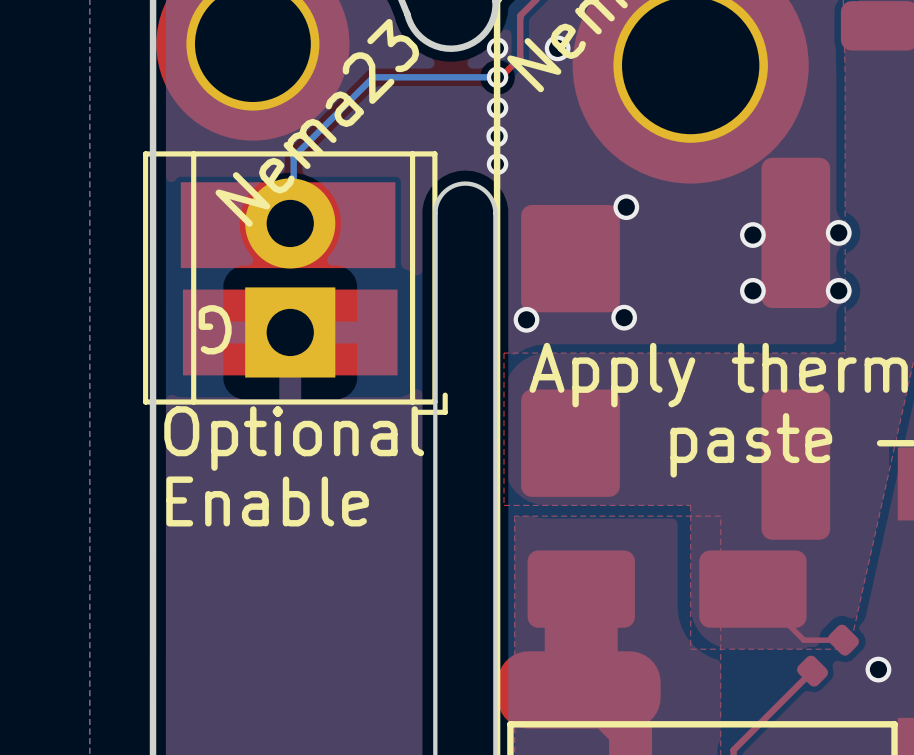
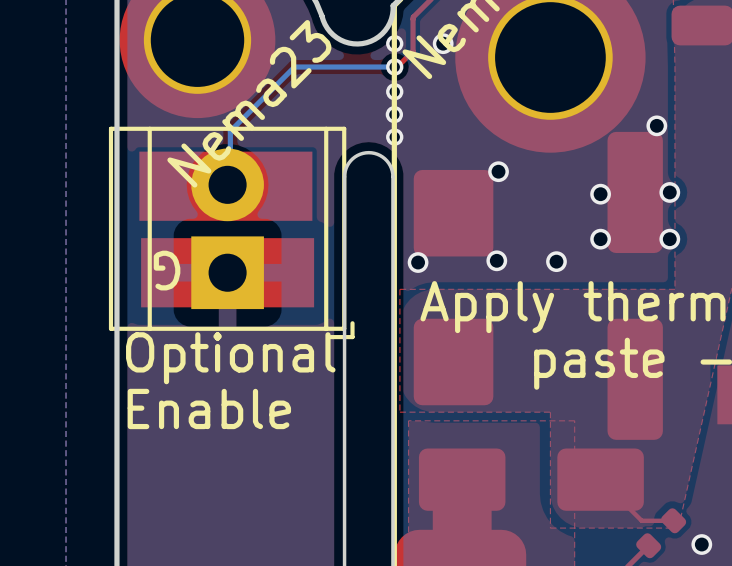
via: none -> (656, 125)
via: none -> (556, 261)

